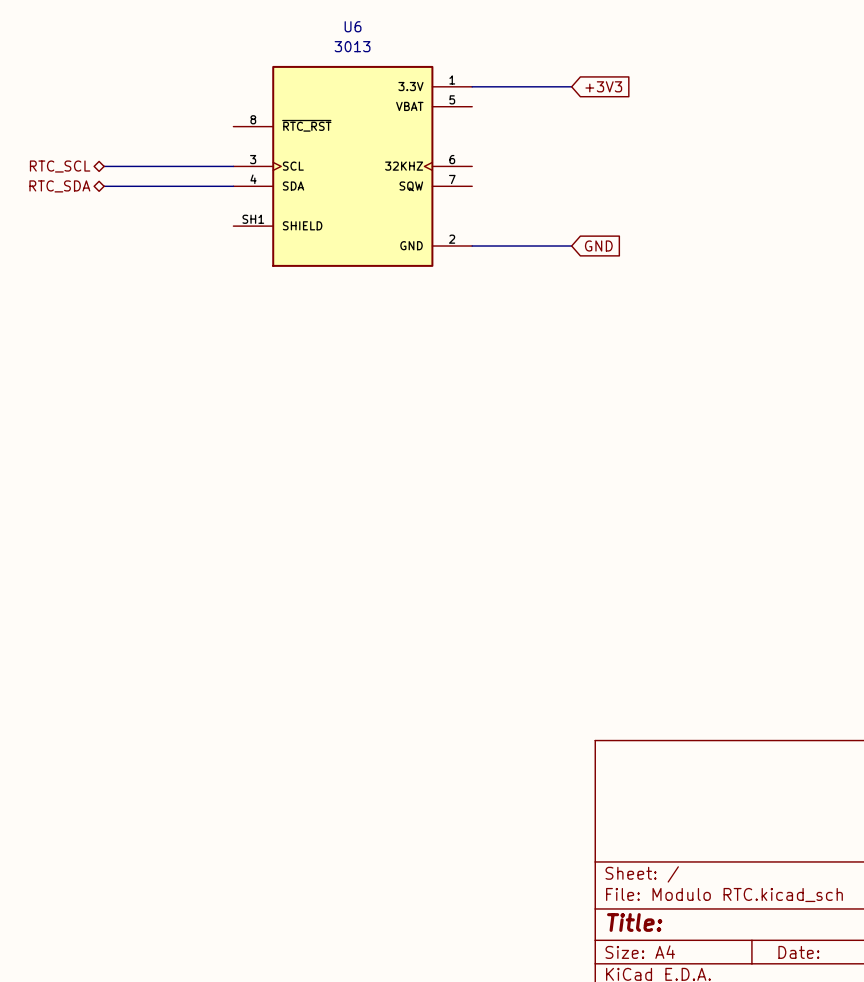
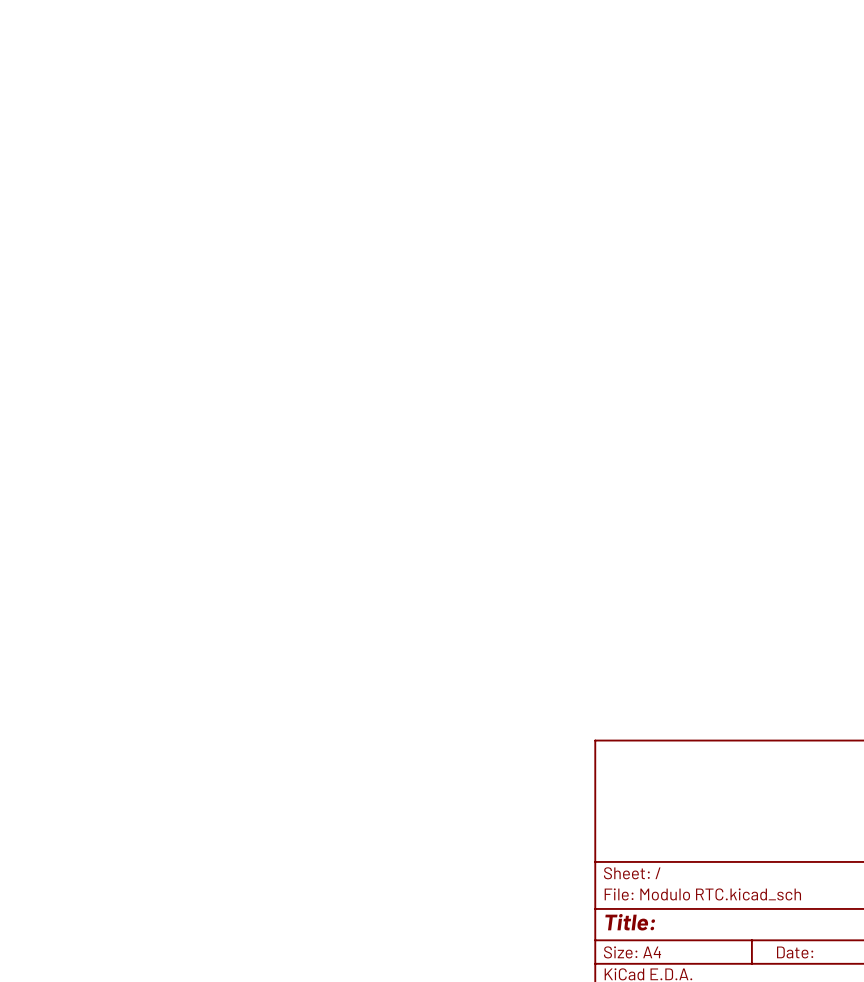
wire: (472, 86) (571, 86) -> none
global label: +3V3 (603, 86) -> none
hierarchical label: RTC_SCL (60, 166) -> none
wire: (104, 166) (233, 166) -> none
U6: 3013 (352, 166) -> none
hierarchical label: RTC_SDA (59, 186) -> none
wire: (104, 186) (233, 186) -> none
wire: (472, 246) (571, 246) -> none
global label: GND (598, 246) -> none

